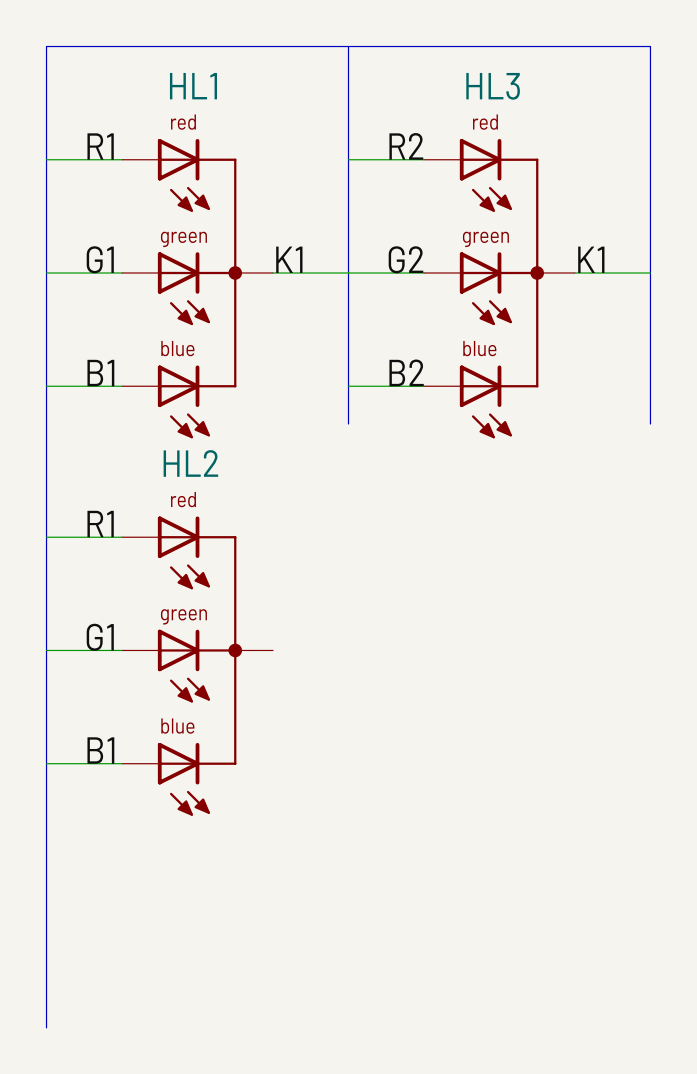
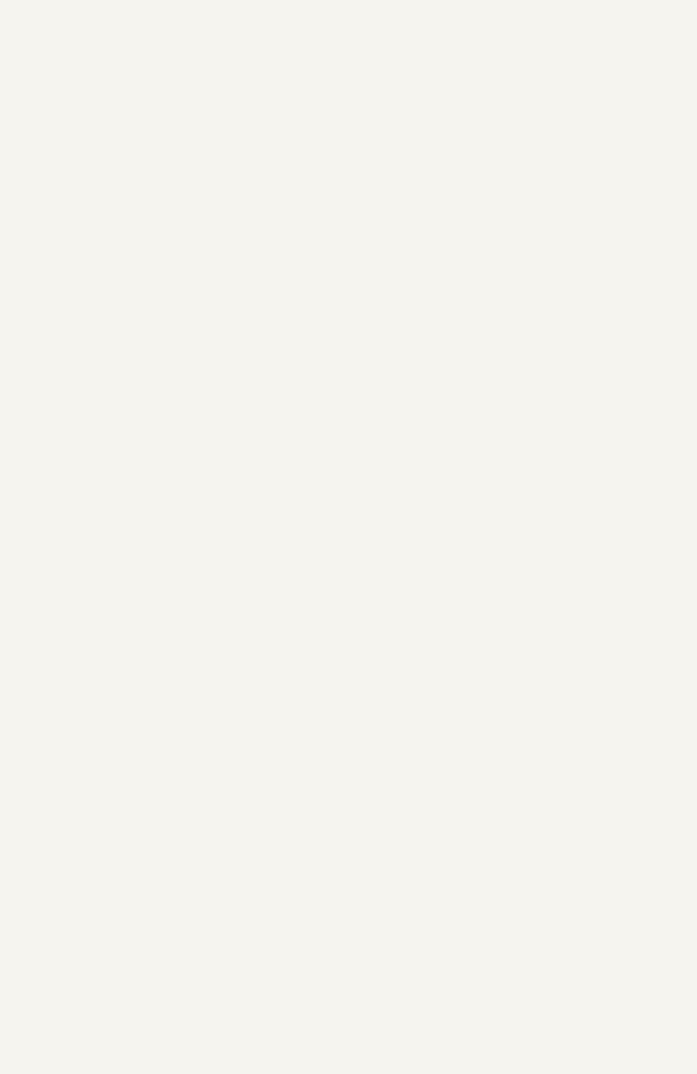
bus: (348, 46) (348, 423) -> none
label: R1 (100, 146) -> none
label: R2 (406, 146) -> none
wire: (46, 159) (122, 159) -> none
wire: (348, 159) (423, 159) -> none
label: G1 (100, 259) -> none
label: K1 (289, 259) -> none
label: G2 (405, 259) -> none
label: K1 (591, 259) -> none
wire: (46, 273) (122, 273) -> none
wire: (273, 273) (423, 273) -> none
wire: (574, 273) (650, 273) -> none
HL1: (197, 288) -> none
HL3: (499, 288) -> none
label: B2 (406, 372) -> none
label: B1 (100, 373) -> none
wire: (46, 386) (122, 386) -> none
wire: (348, 386) (423, 386) -> none
bus: (650, 423) (650, 46) (46, 46) (46, 1027) -> none
label: R1 (100, 524) -> none
wire: (46, 537) (122, 537) -> none
label: G1 (100, 637) -> none
wire: (46, 650) (122, 650) -> none
HL2: (197, 666) -> none
label: B1 (100, 750) -> none
wire: (46, 763) (122, 763) -> none

